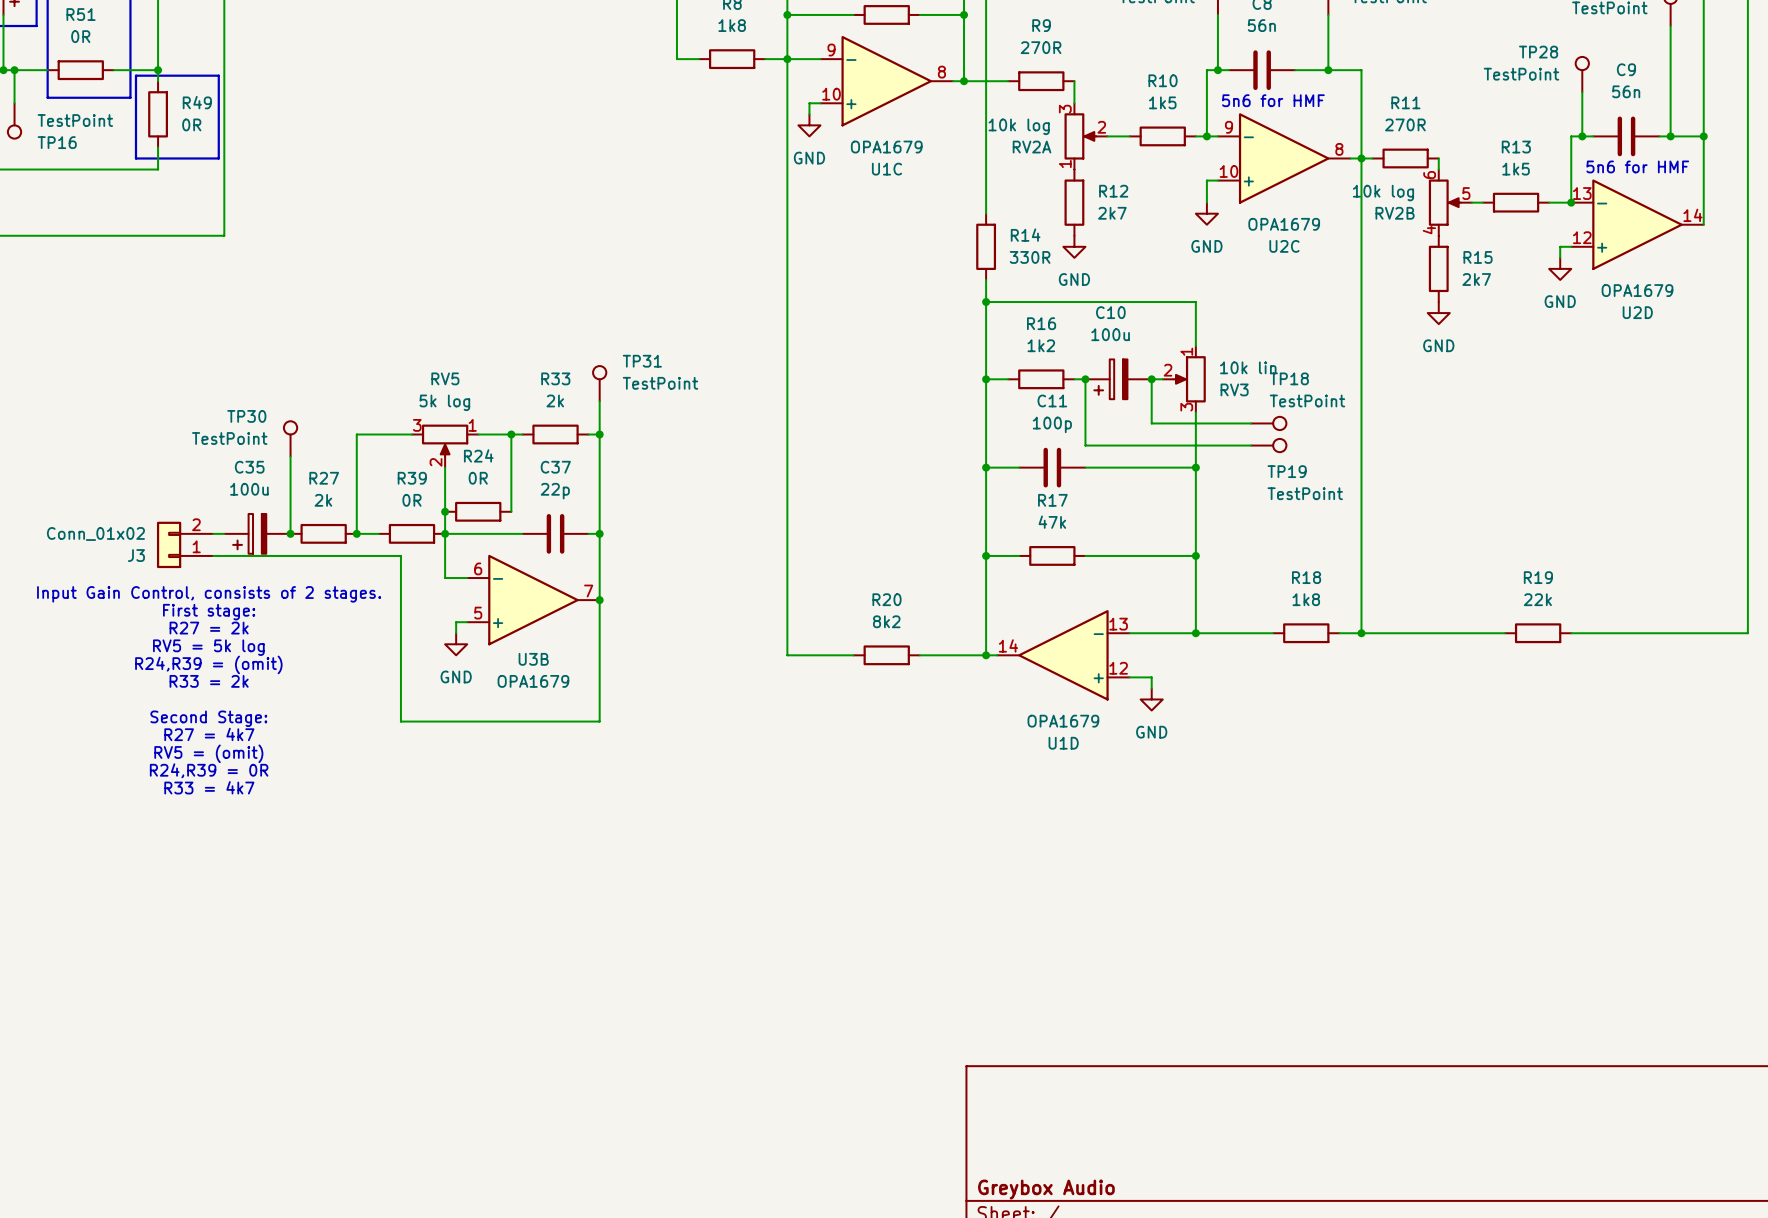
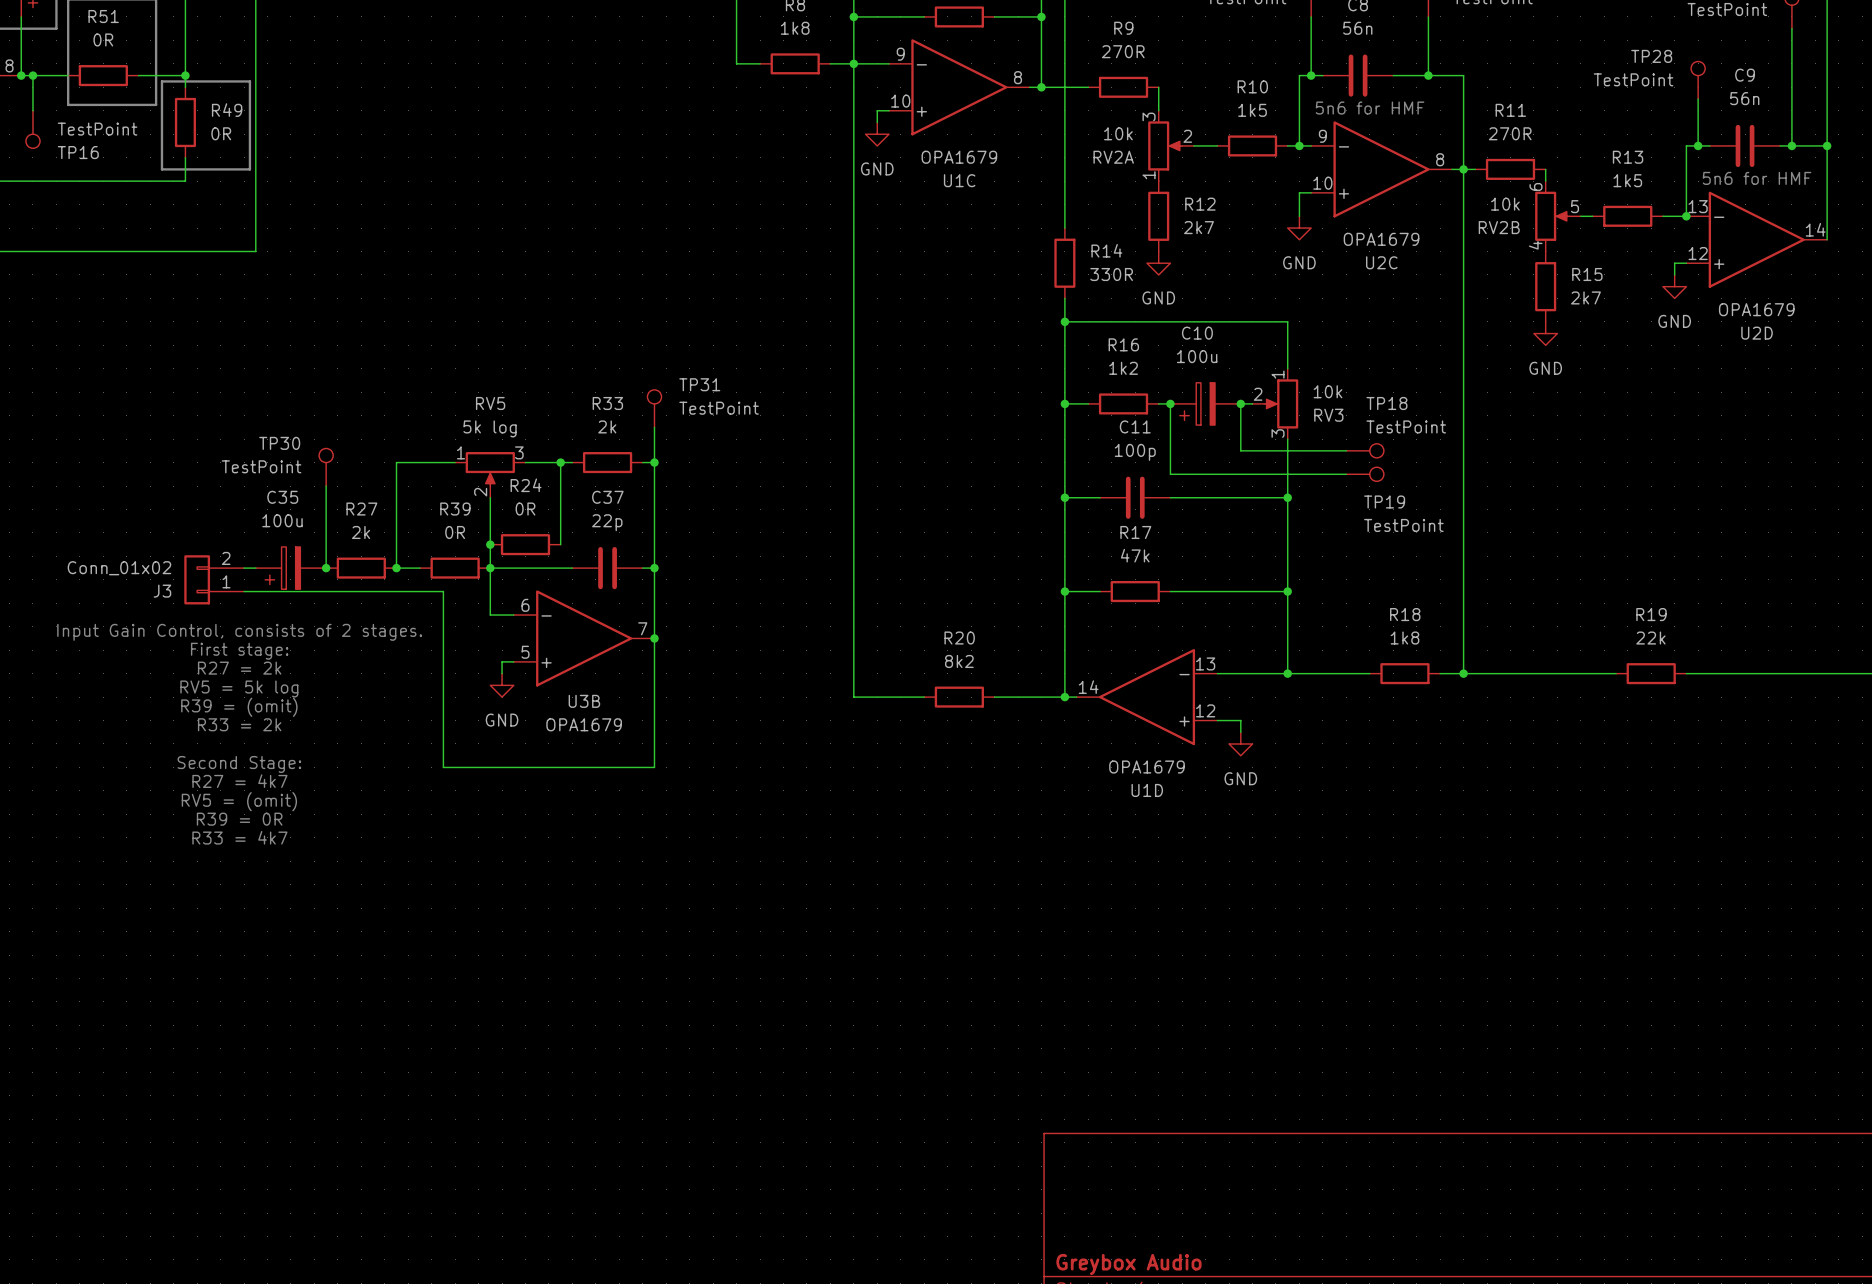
RV2A value: 10k log (1019, 126) -> 10k (1118, 133)
RV2B value: 10k log (1383, 193) -> 10k (1505, 204)
RV3 value: 10k lin (1248, 367) -> 10k (1327, 391)
RV5 flip: as is (445, 440) -> left-right (490, 469)
text: R24,R39 = (omit) (208, 664) -> R39 = (omit) (239, 707)
text: R24,R39 = 0R (209, 770) -> R39 = 0R (239, 819)

